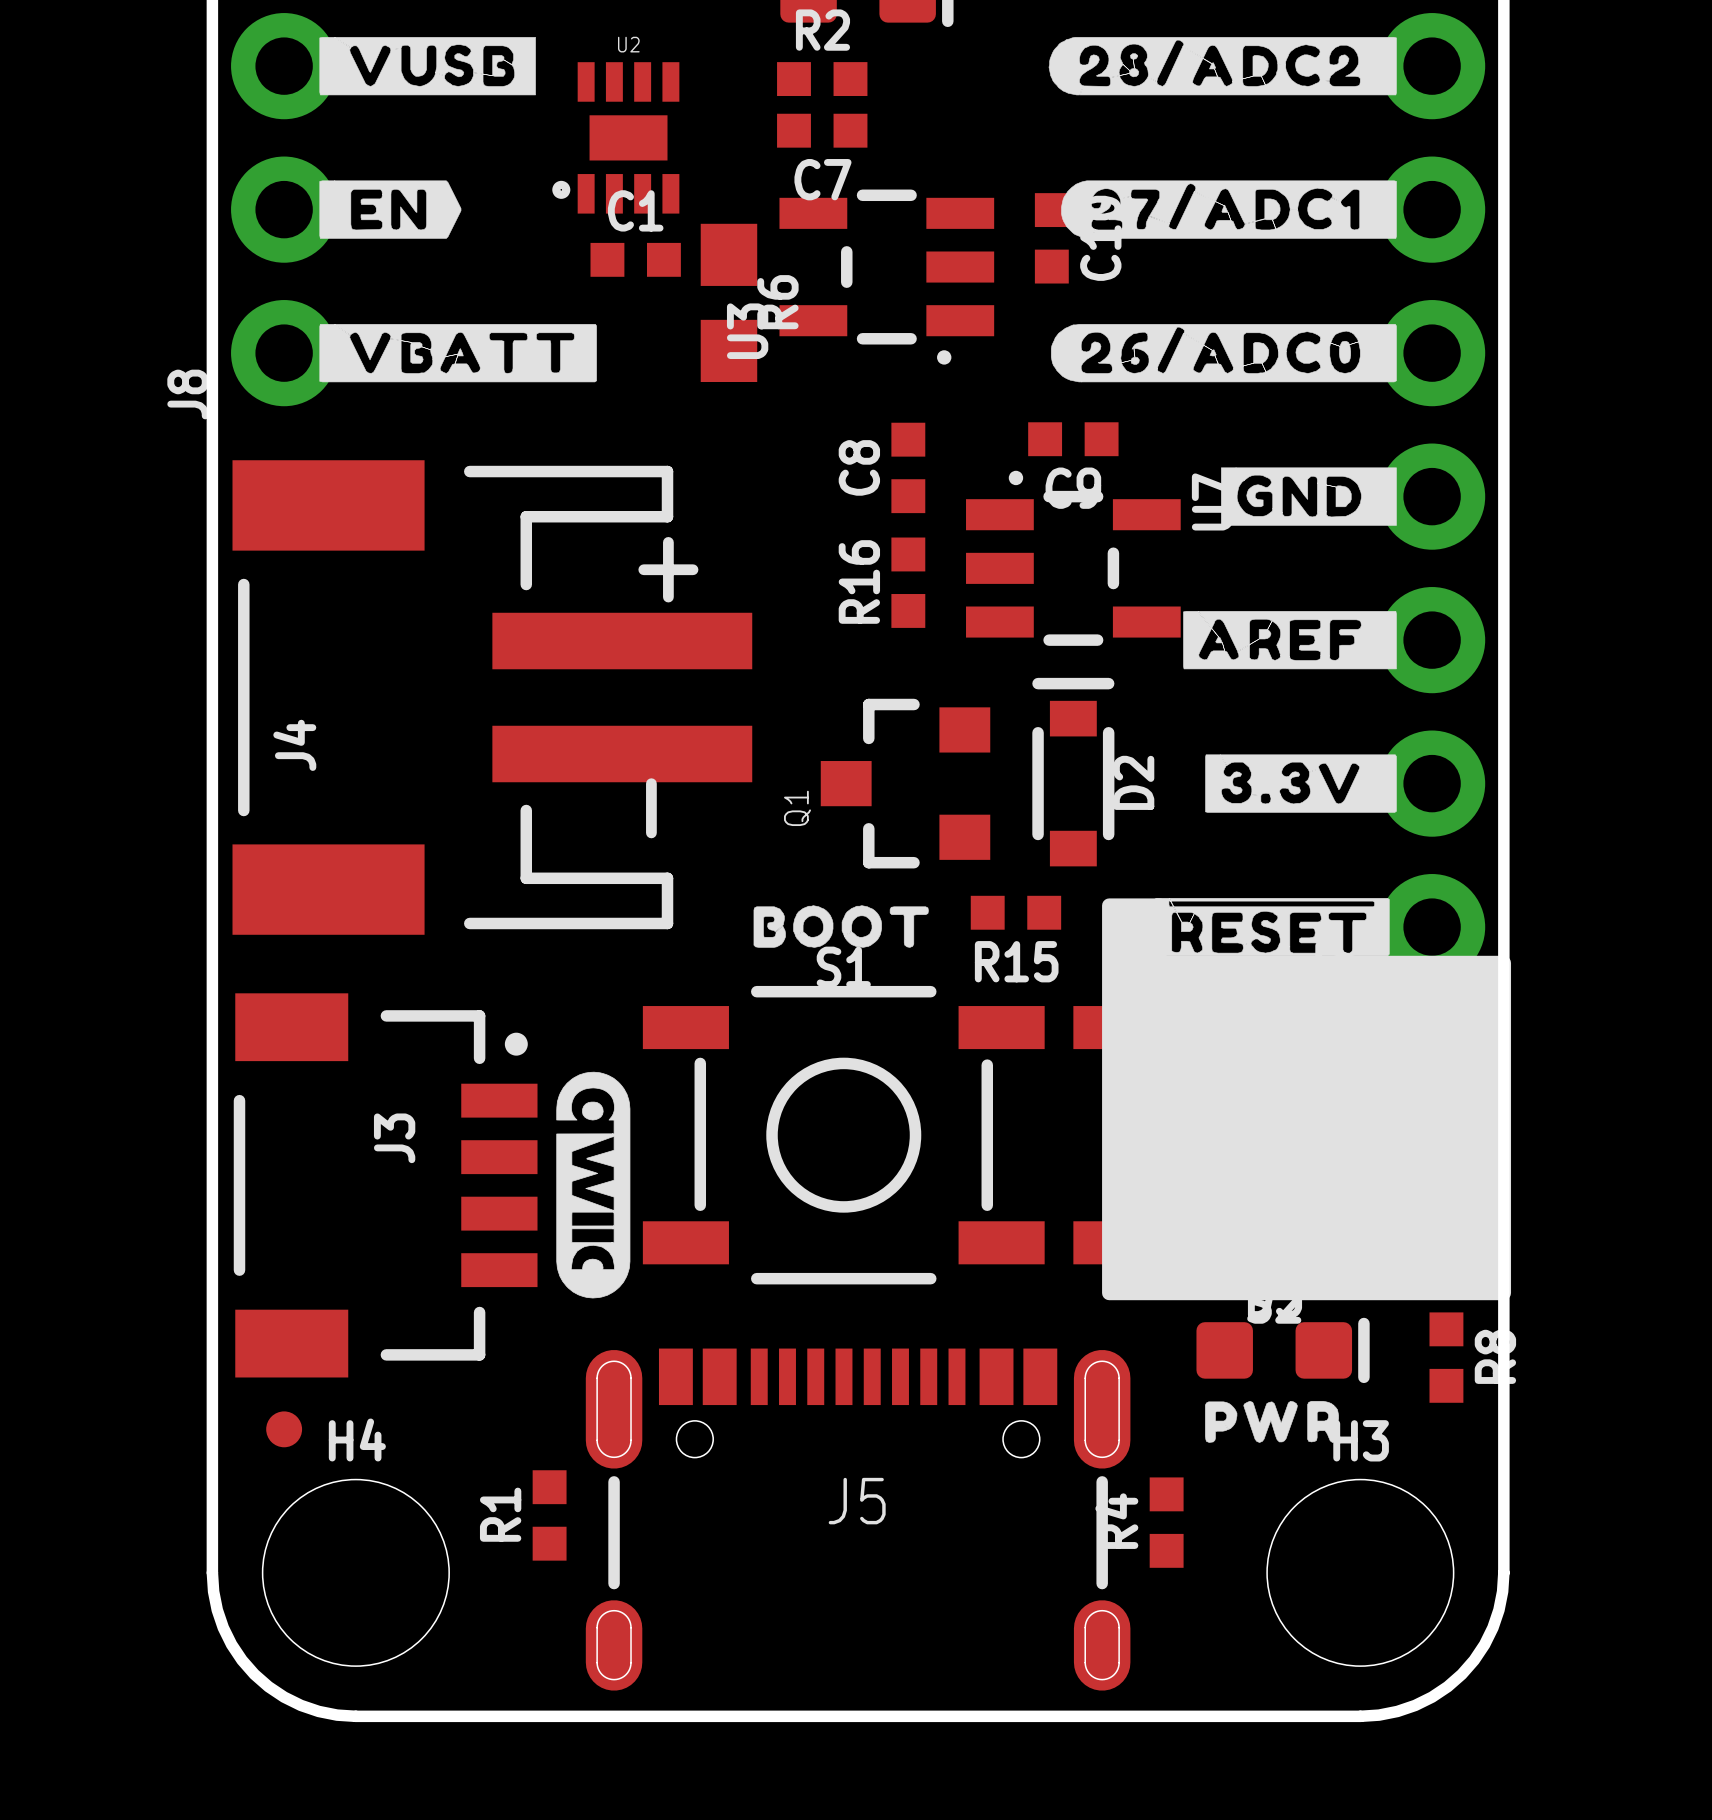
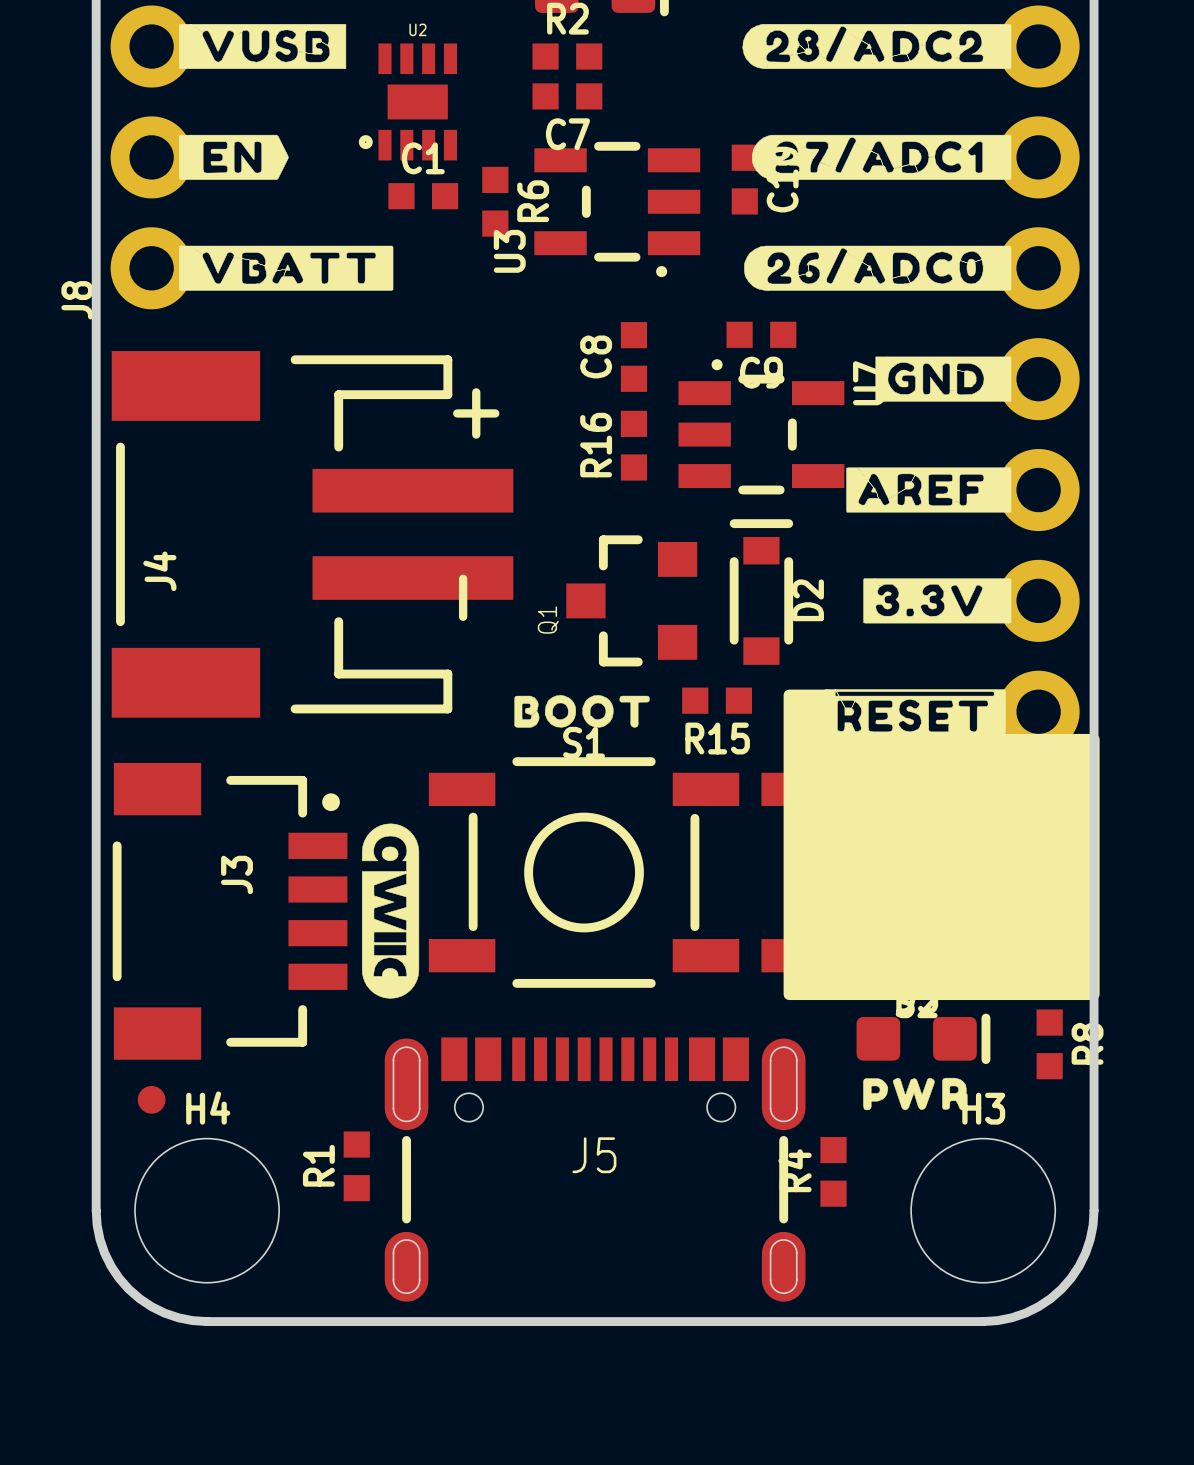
R6 footprint: [700, 223, 758, 382] -> [482, 166, 509, 237]
text position: + (668, 569) -> + (476, 413)
text position: - (651, 808) -> - (463, 597)

